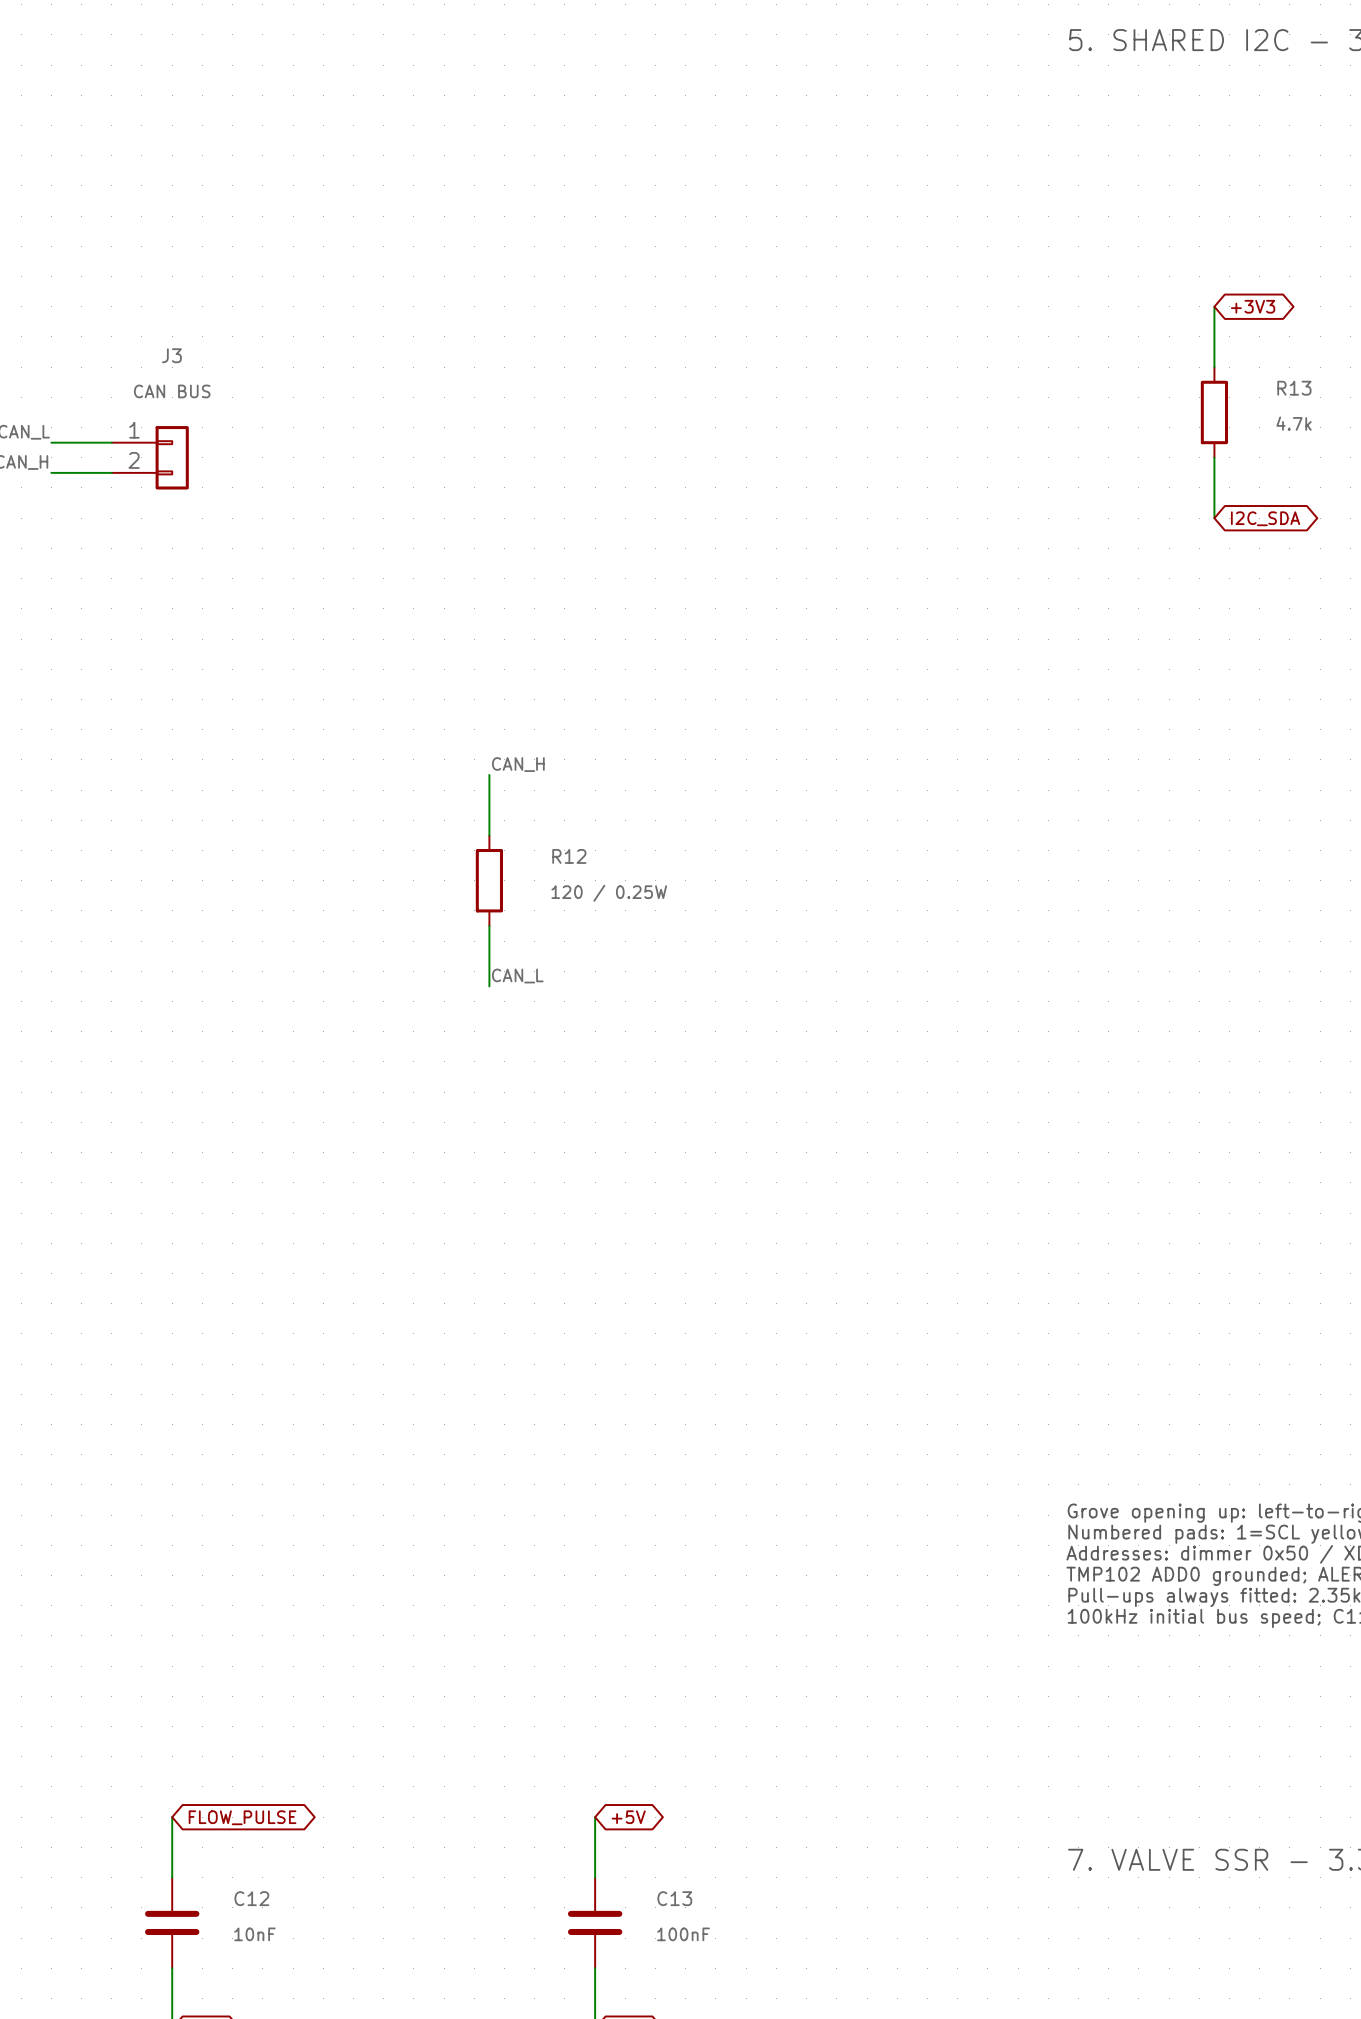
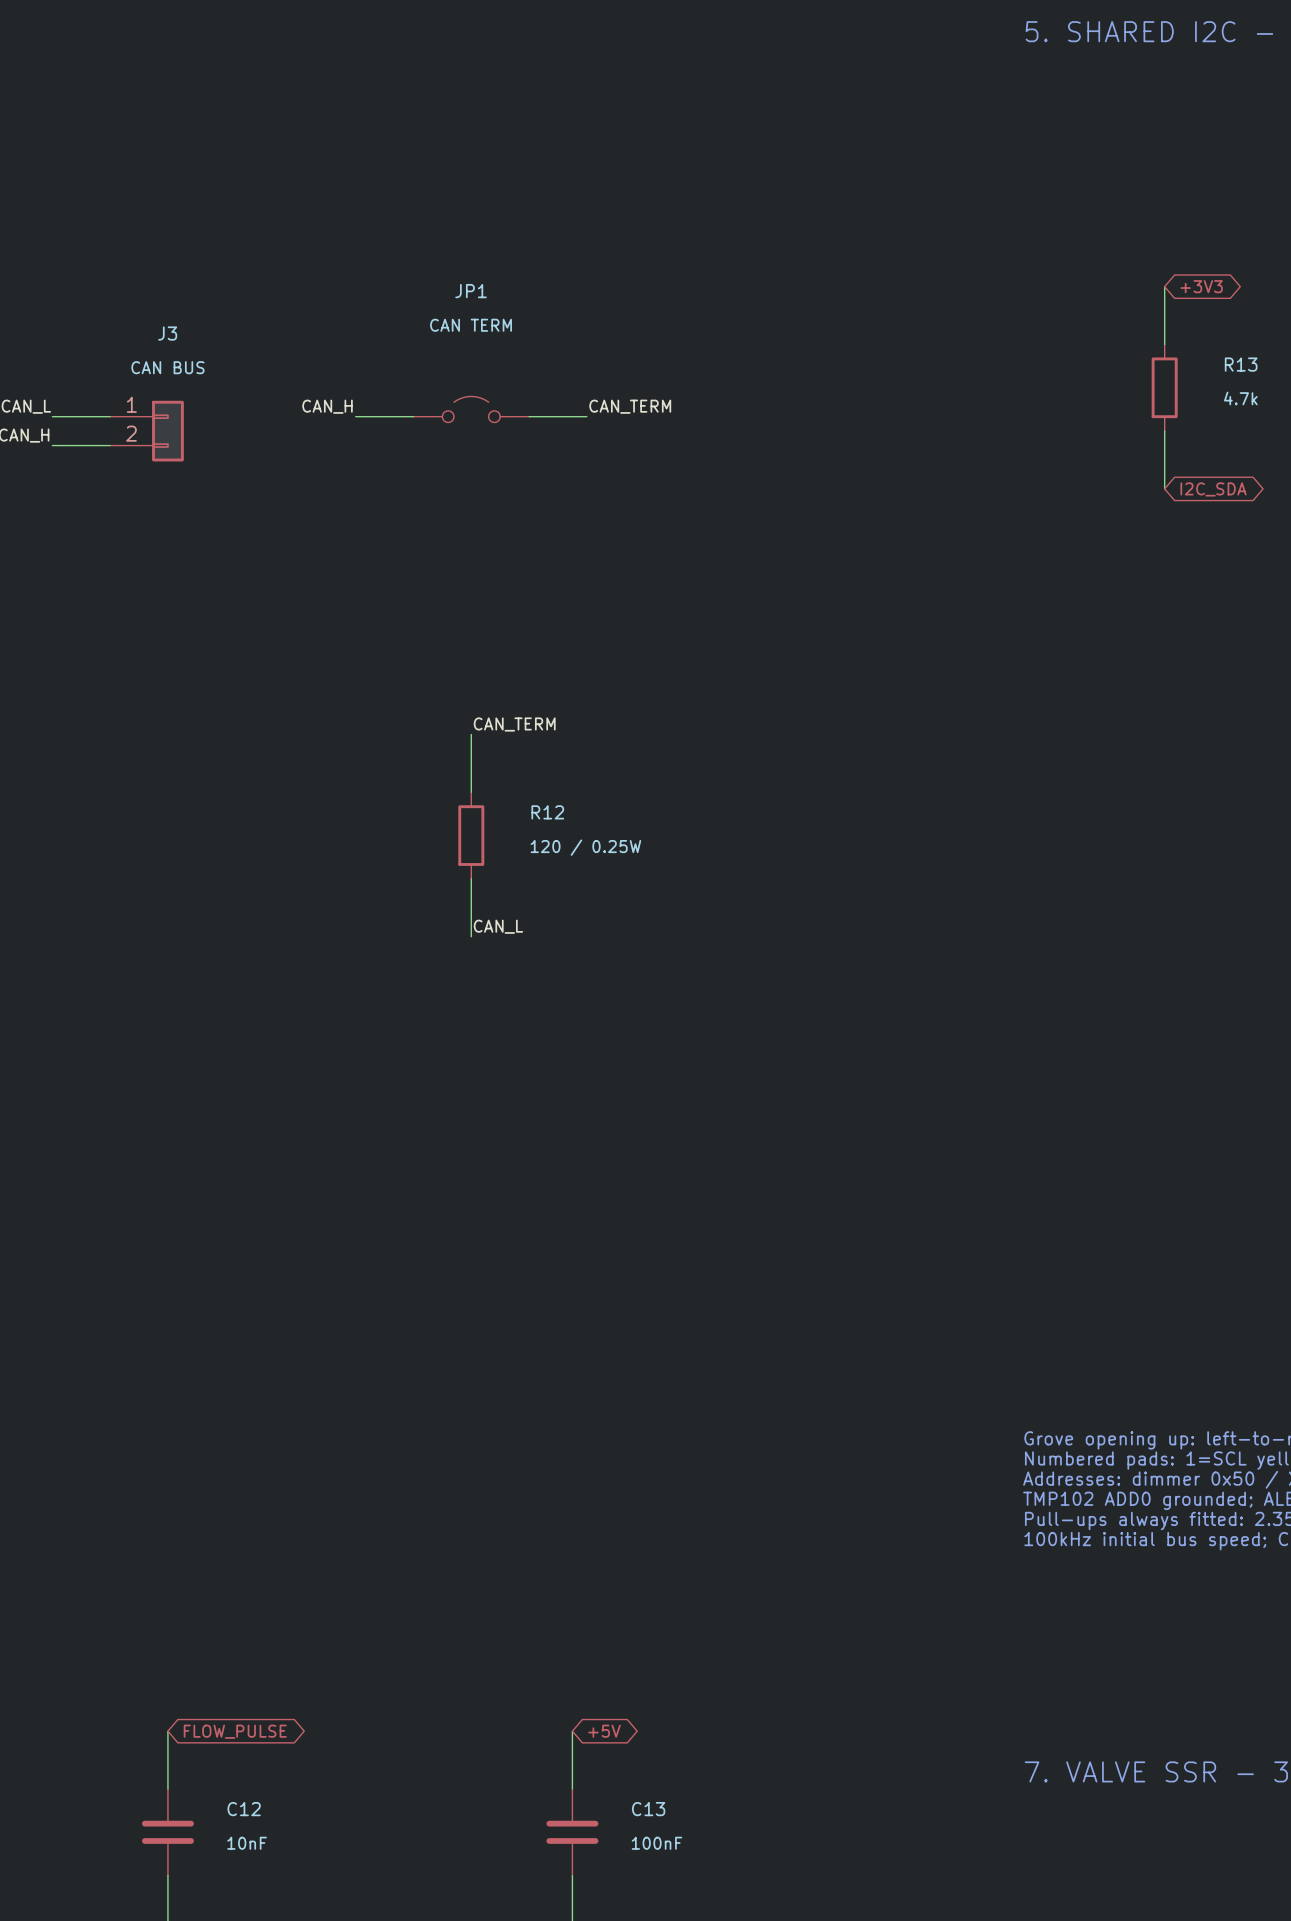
label: none -> CAN_H (327, 406)
label: none -> CAN_TERM (630, 406)
JP1: none -> CAN TERM (471, 409)
wire: none -> (355, 416) (413, 416)
wire: none -> (529, 416) (586, 416)
label: CAN_H (518, 764) -> CAN_TERM (514, 724)

